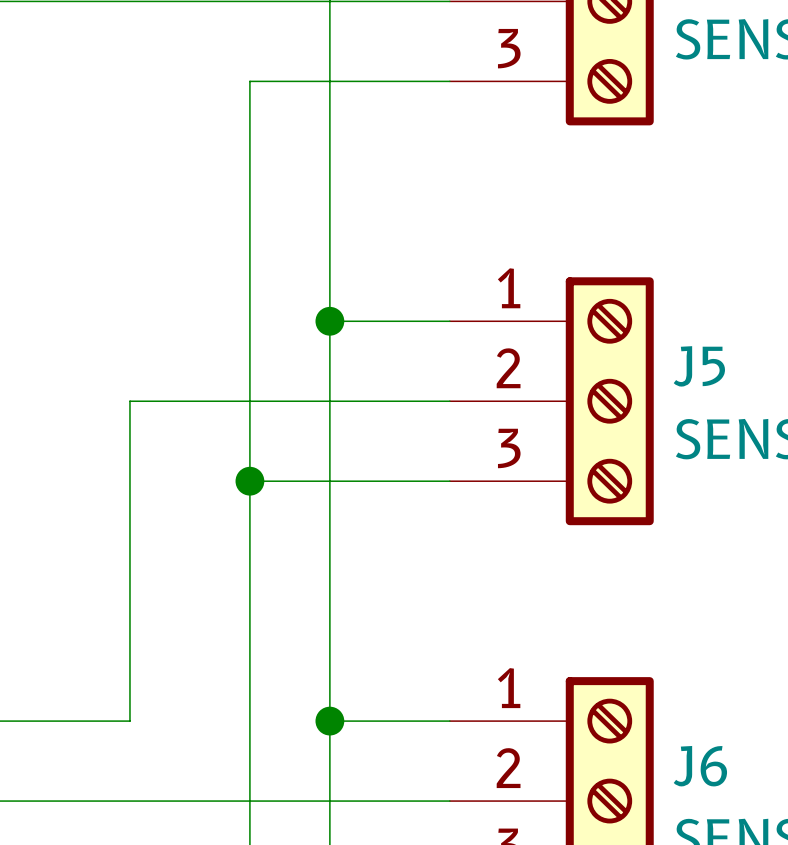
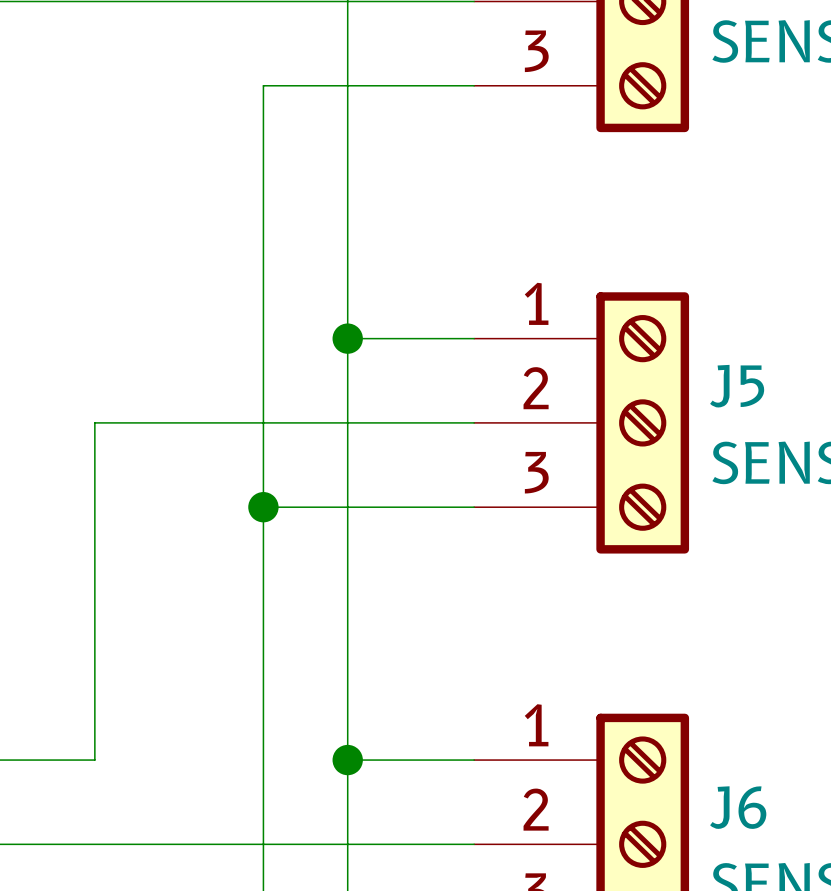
wire: (129, 401) (129, 721) (89, 721) -> (137, 422) (94, 422) (94, 760)

